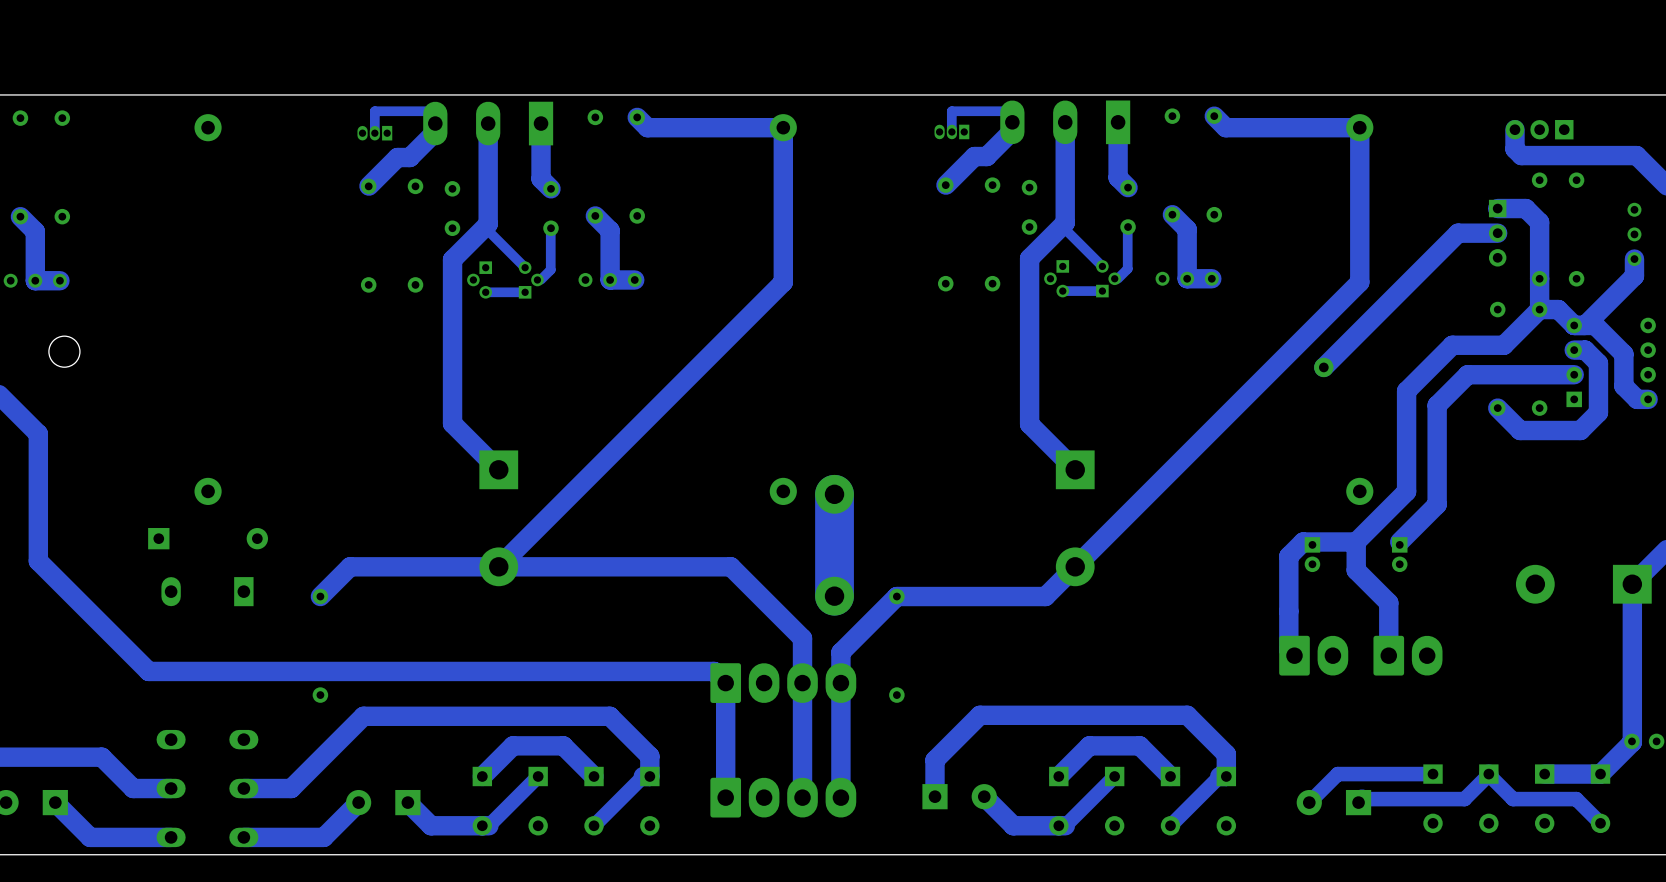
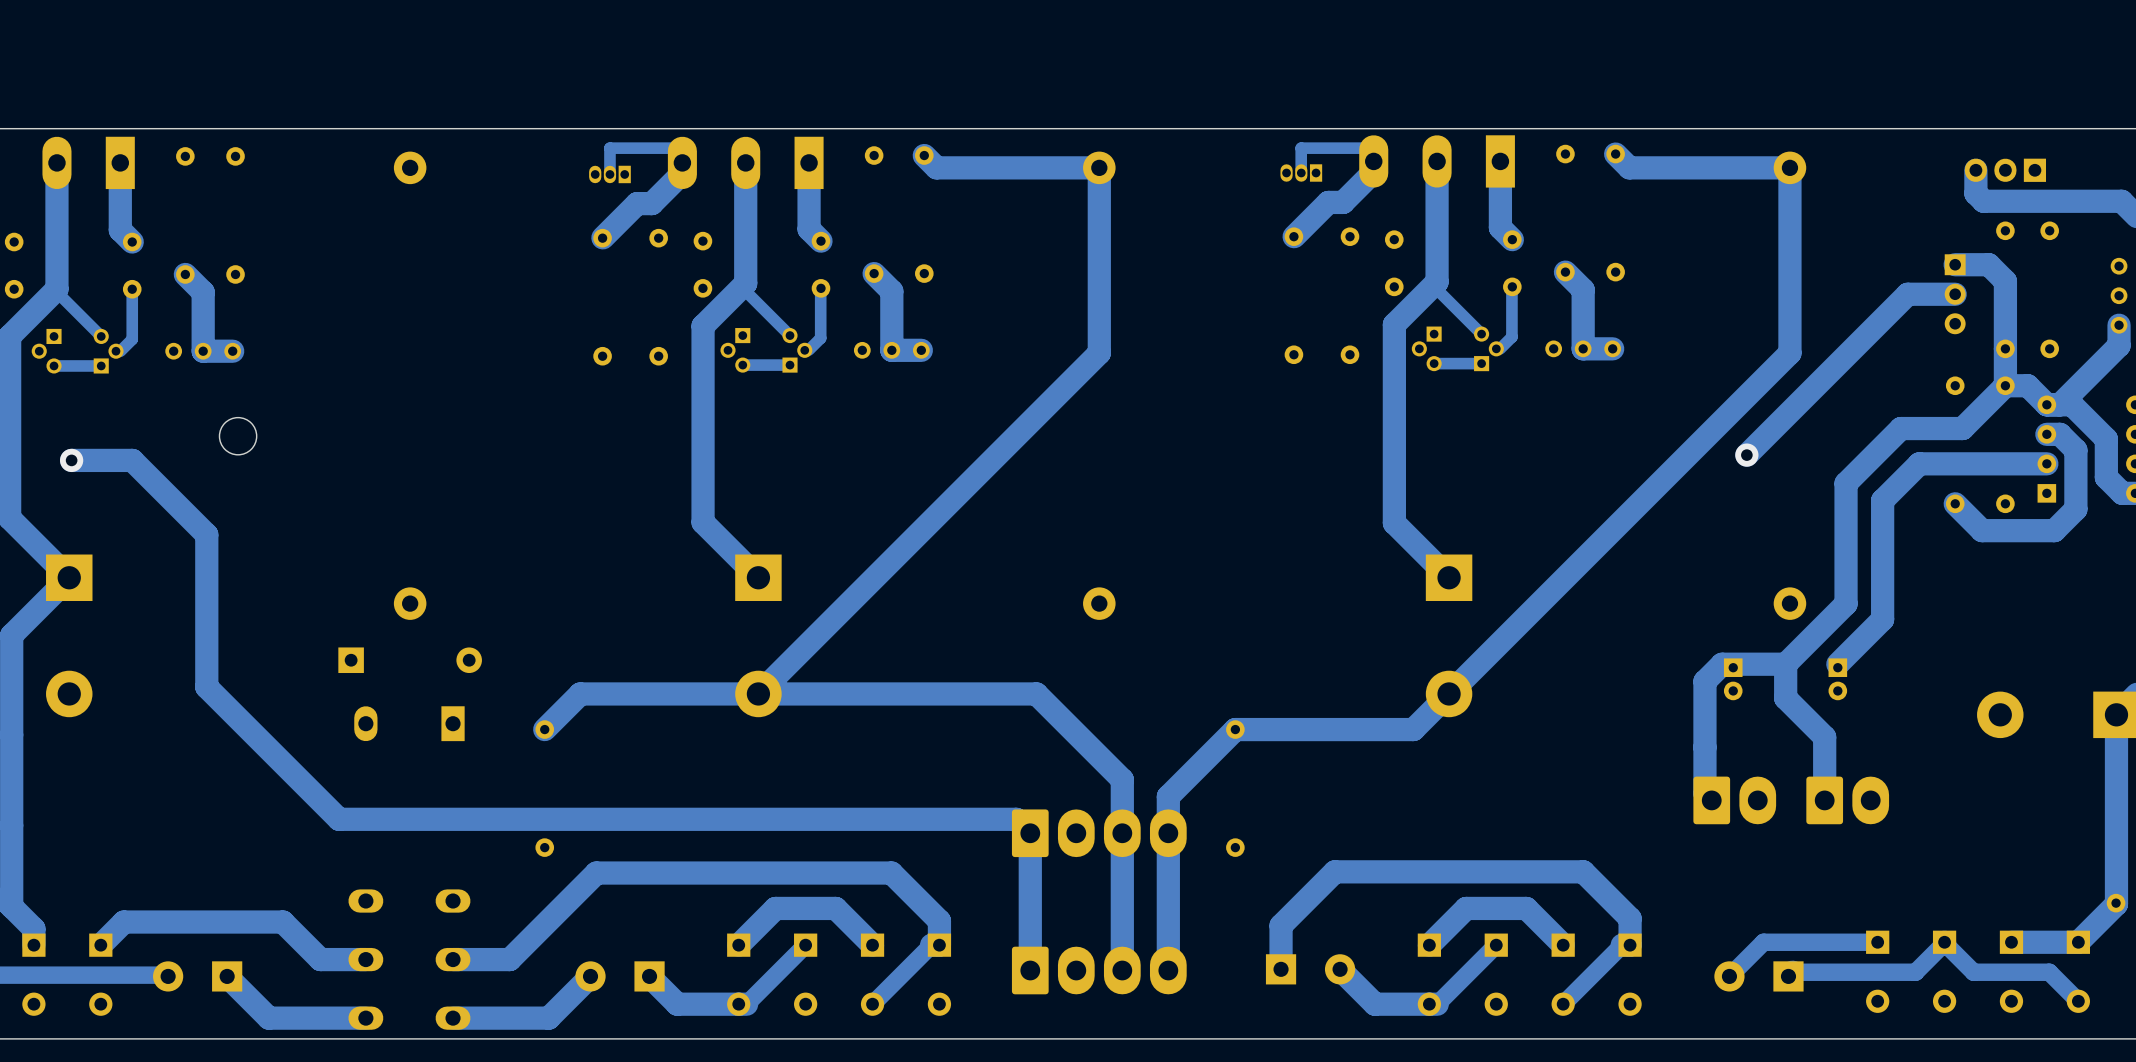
track: (834, 494) (834, 596) -> none
via: (834, 494) -> none
via: (834, 596) -> none

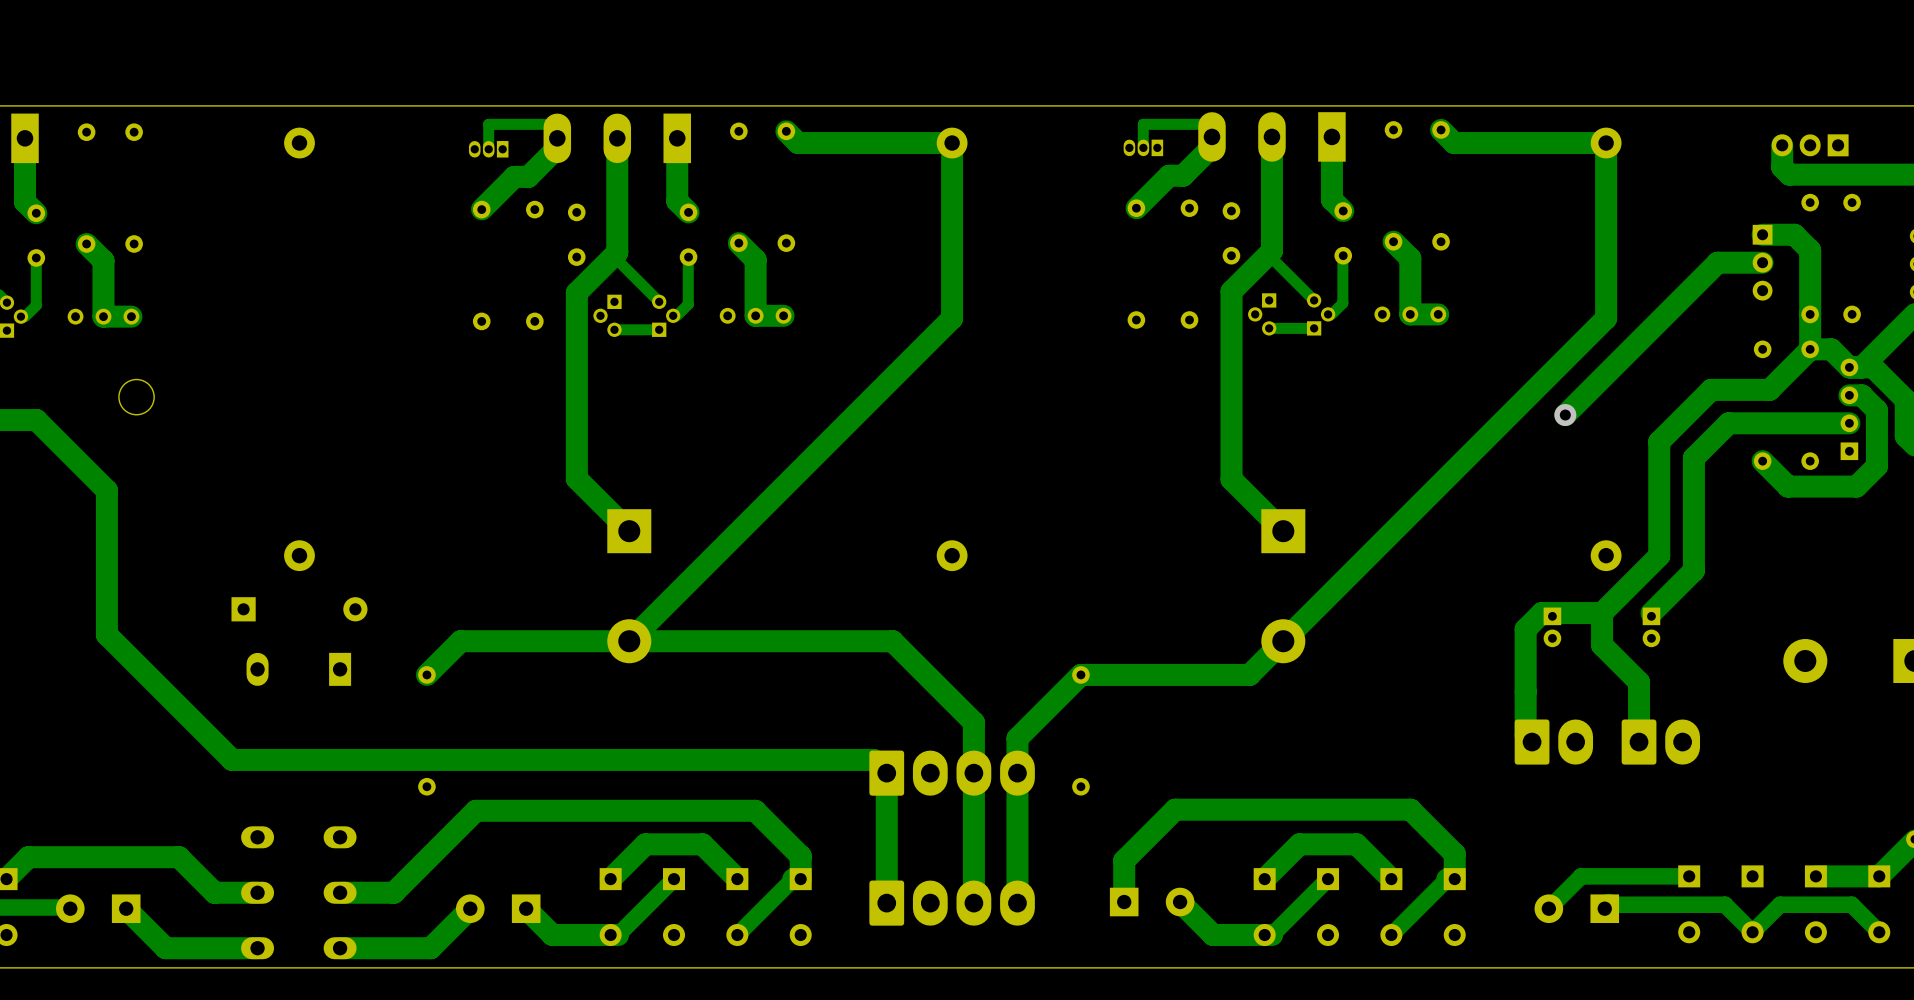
track: (1944, 943) (1915, 972) -> (1780, 904) (1752, 932) (1725, 904)
track: (1944, 943) (1973, 972) -> none

